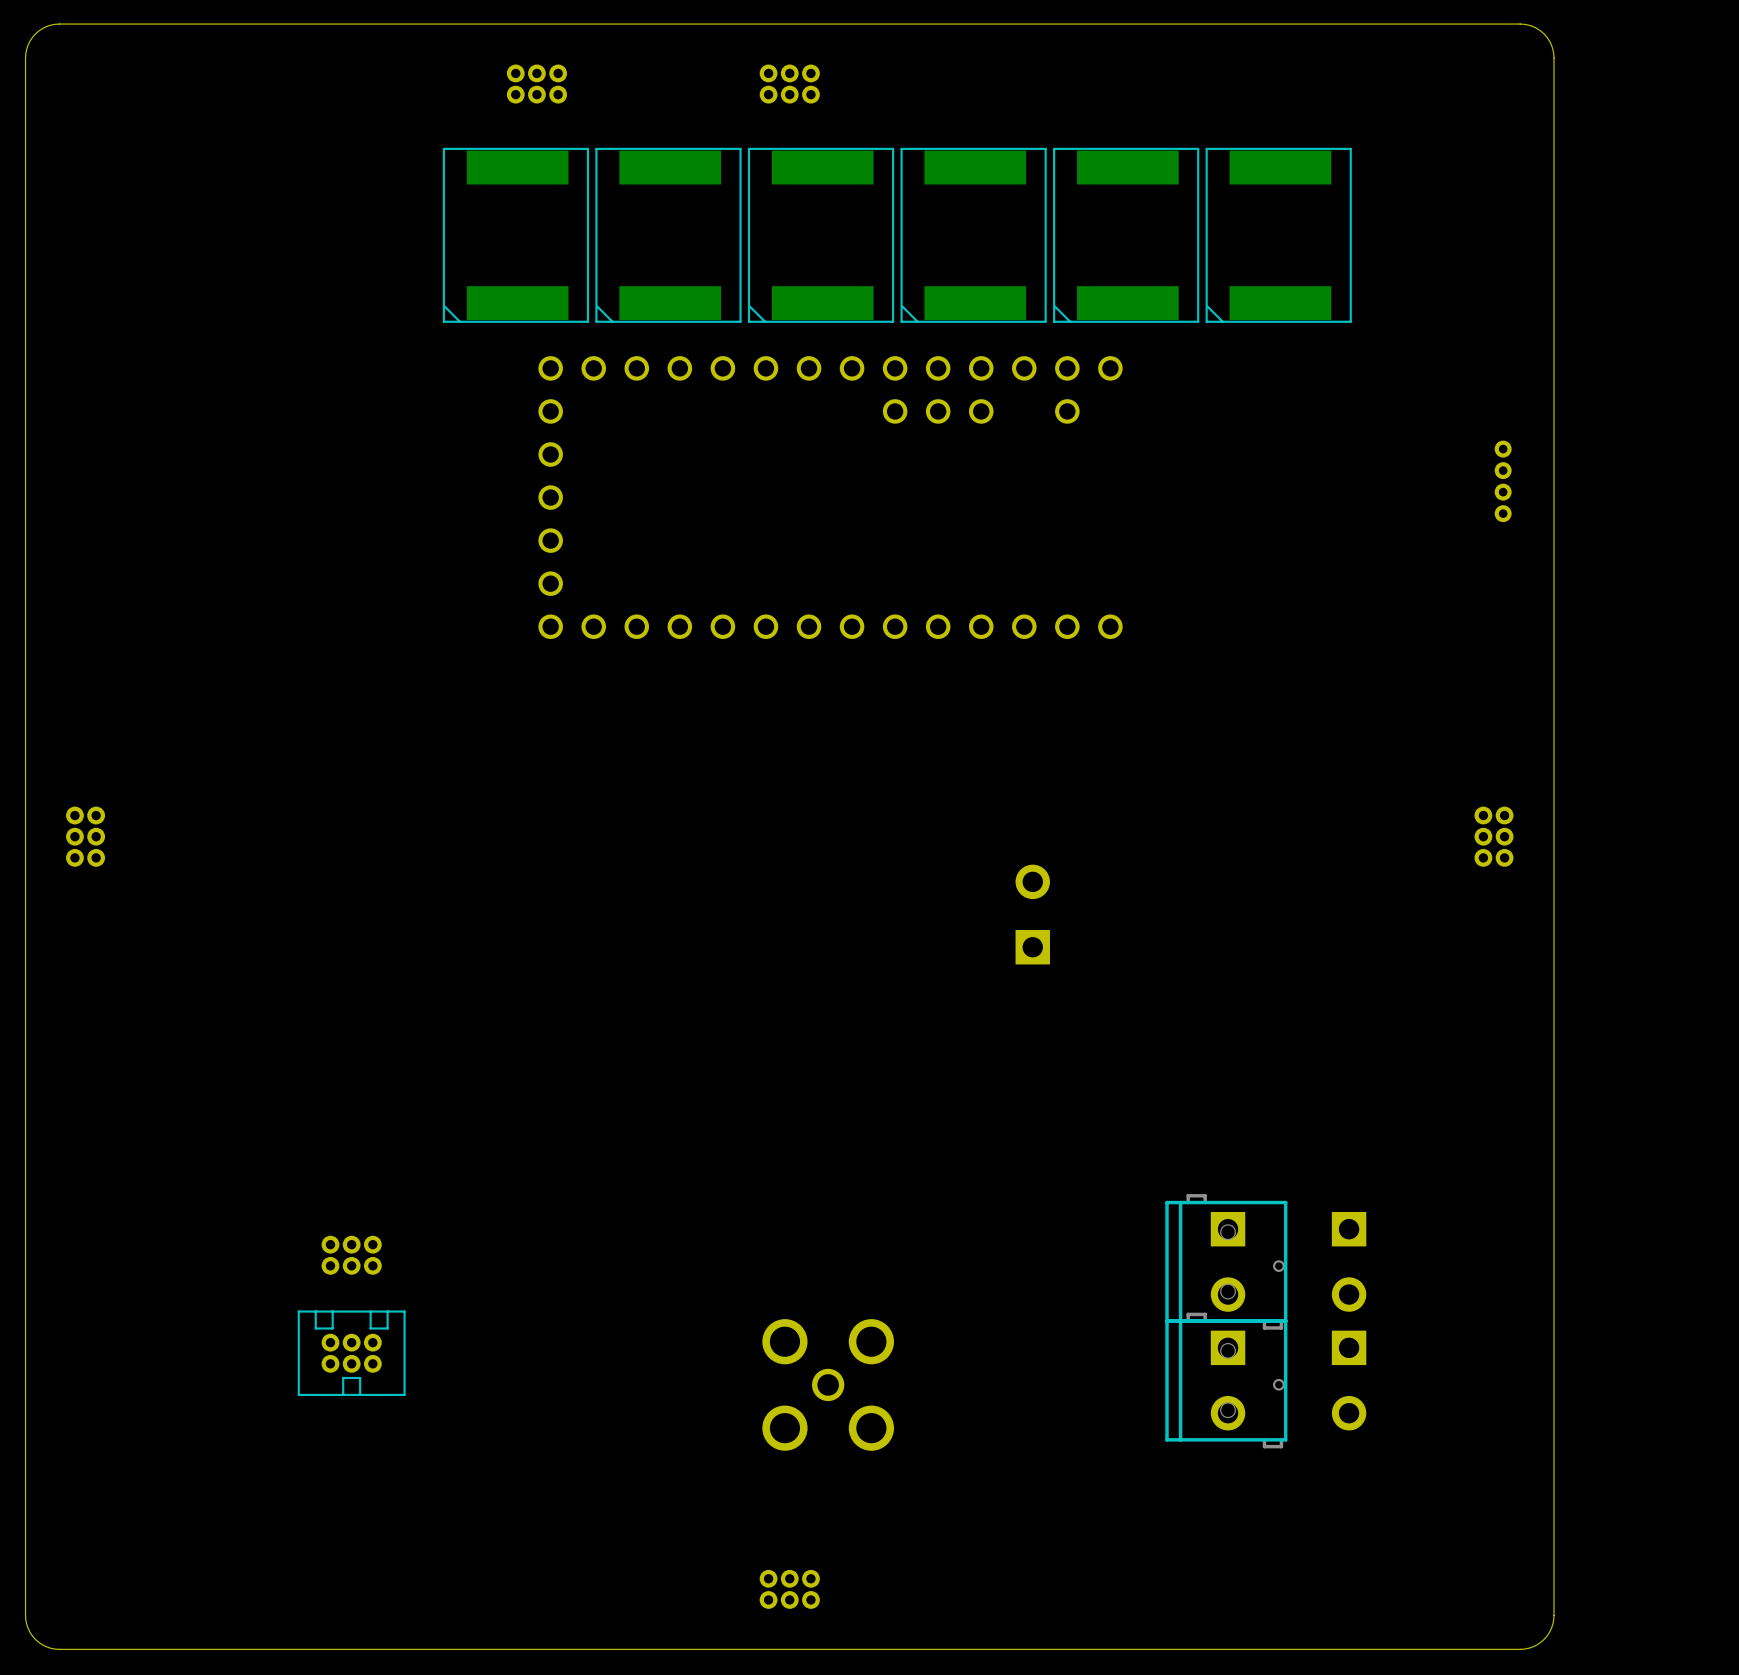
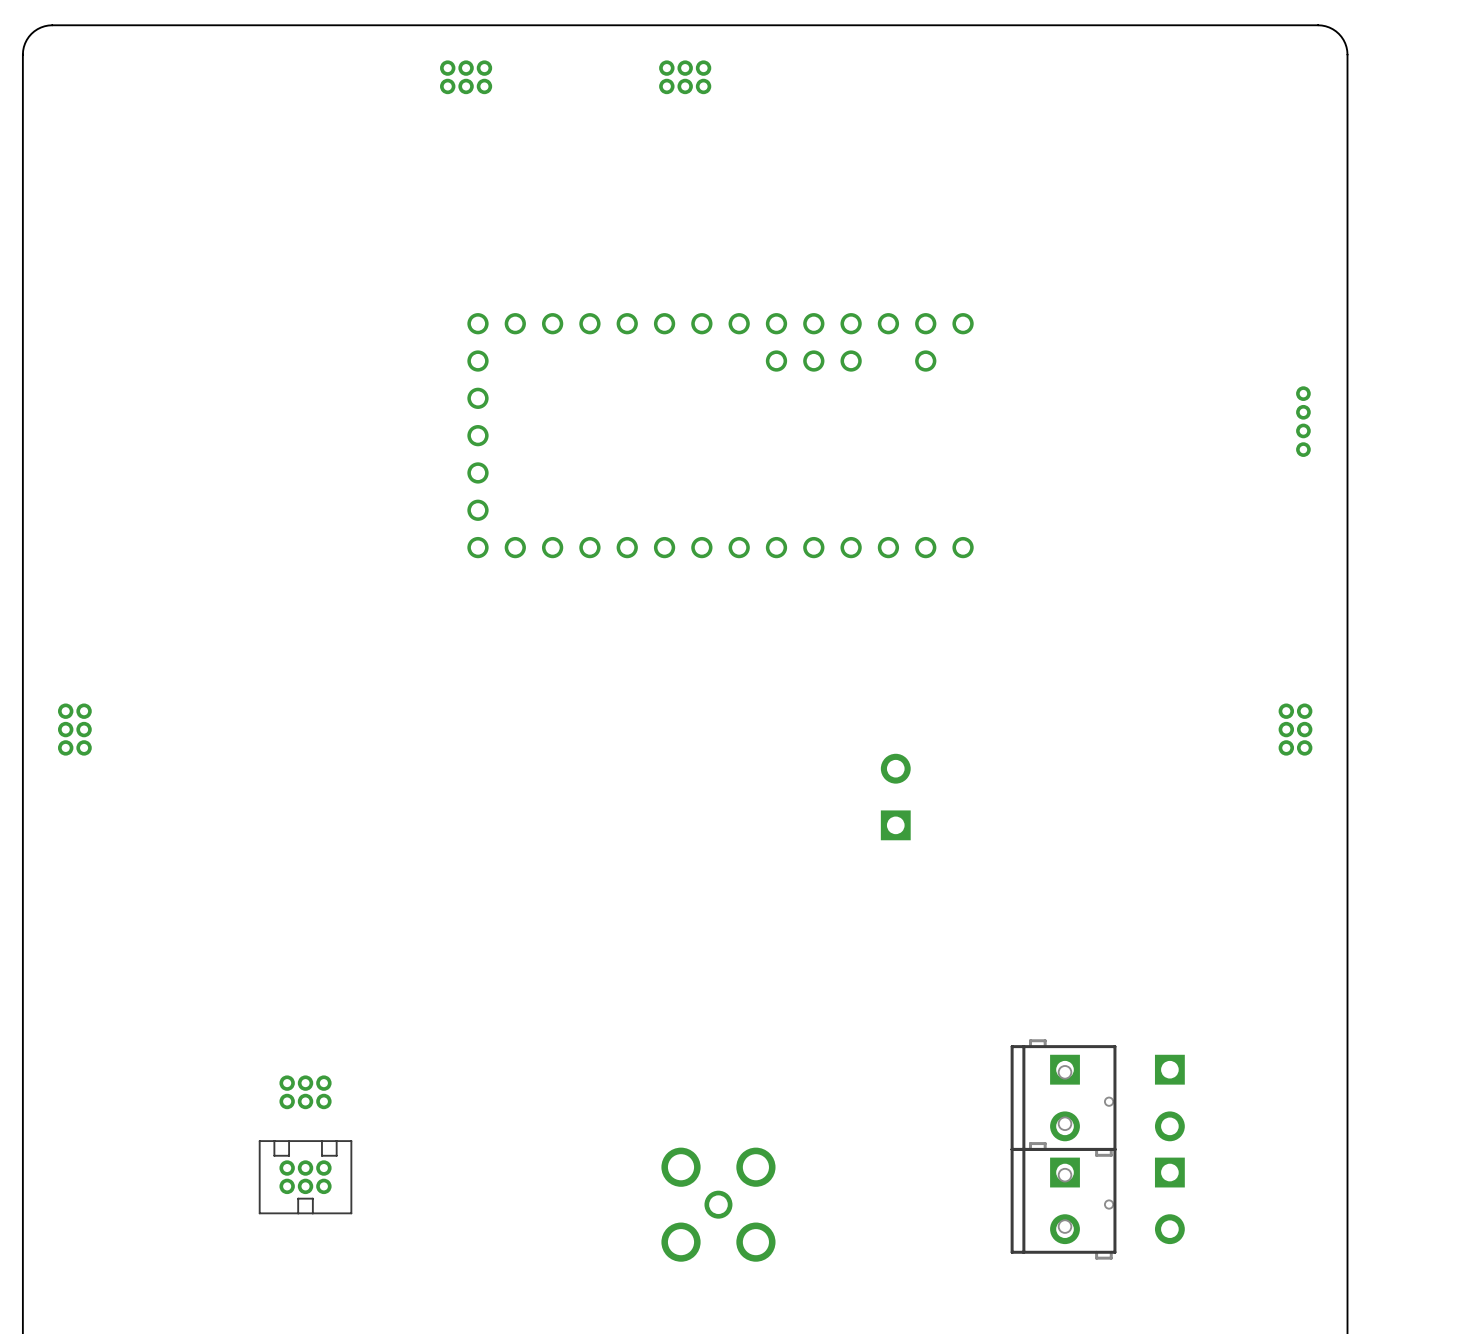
part: (515, 235) -> none
part: (668, 235) -> none
part: (821, 235) -> none
part: (973, 235) -> none
part: (1126, 235) -> none
part: (1278, 235) -> none

